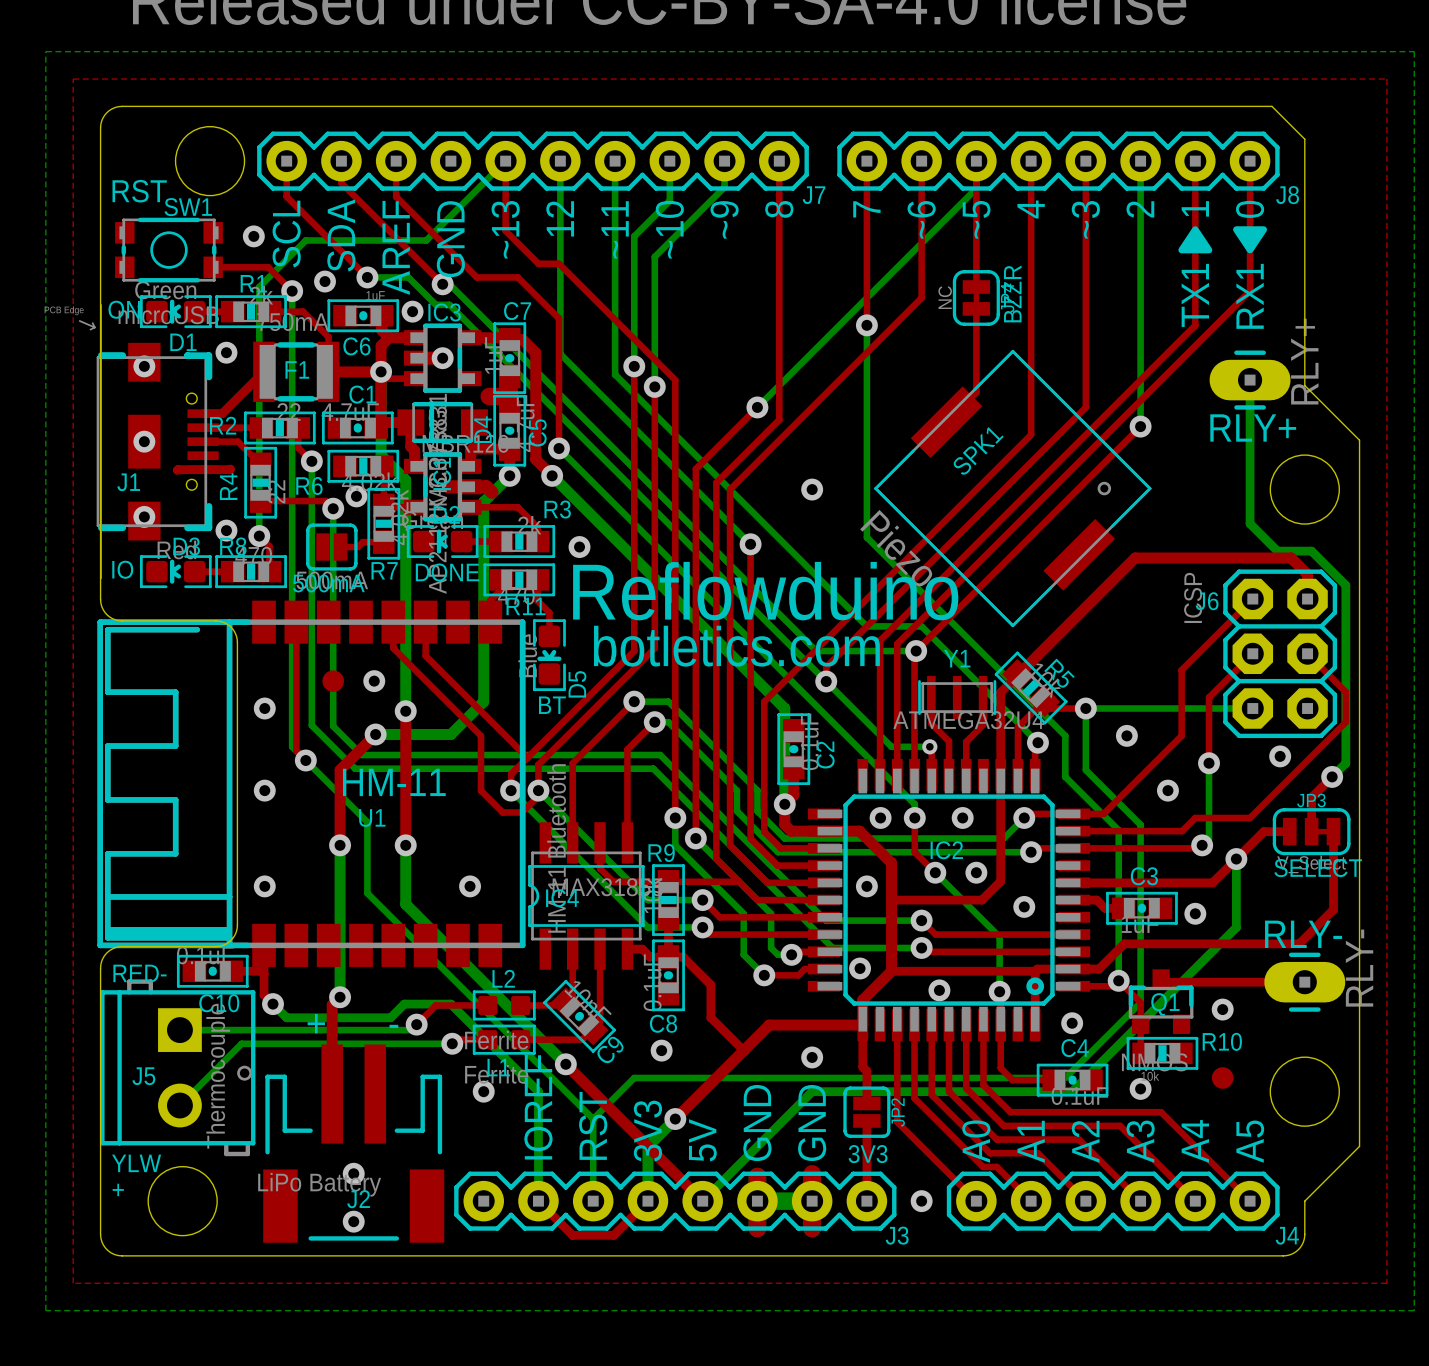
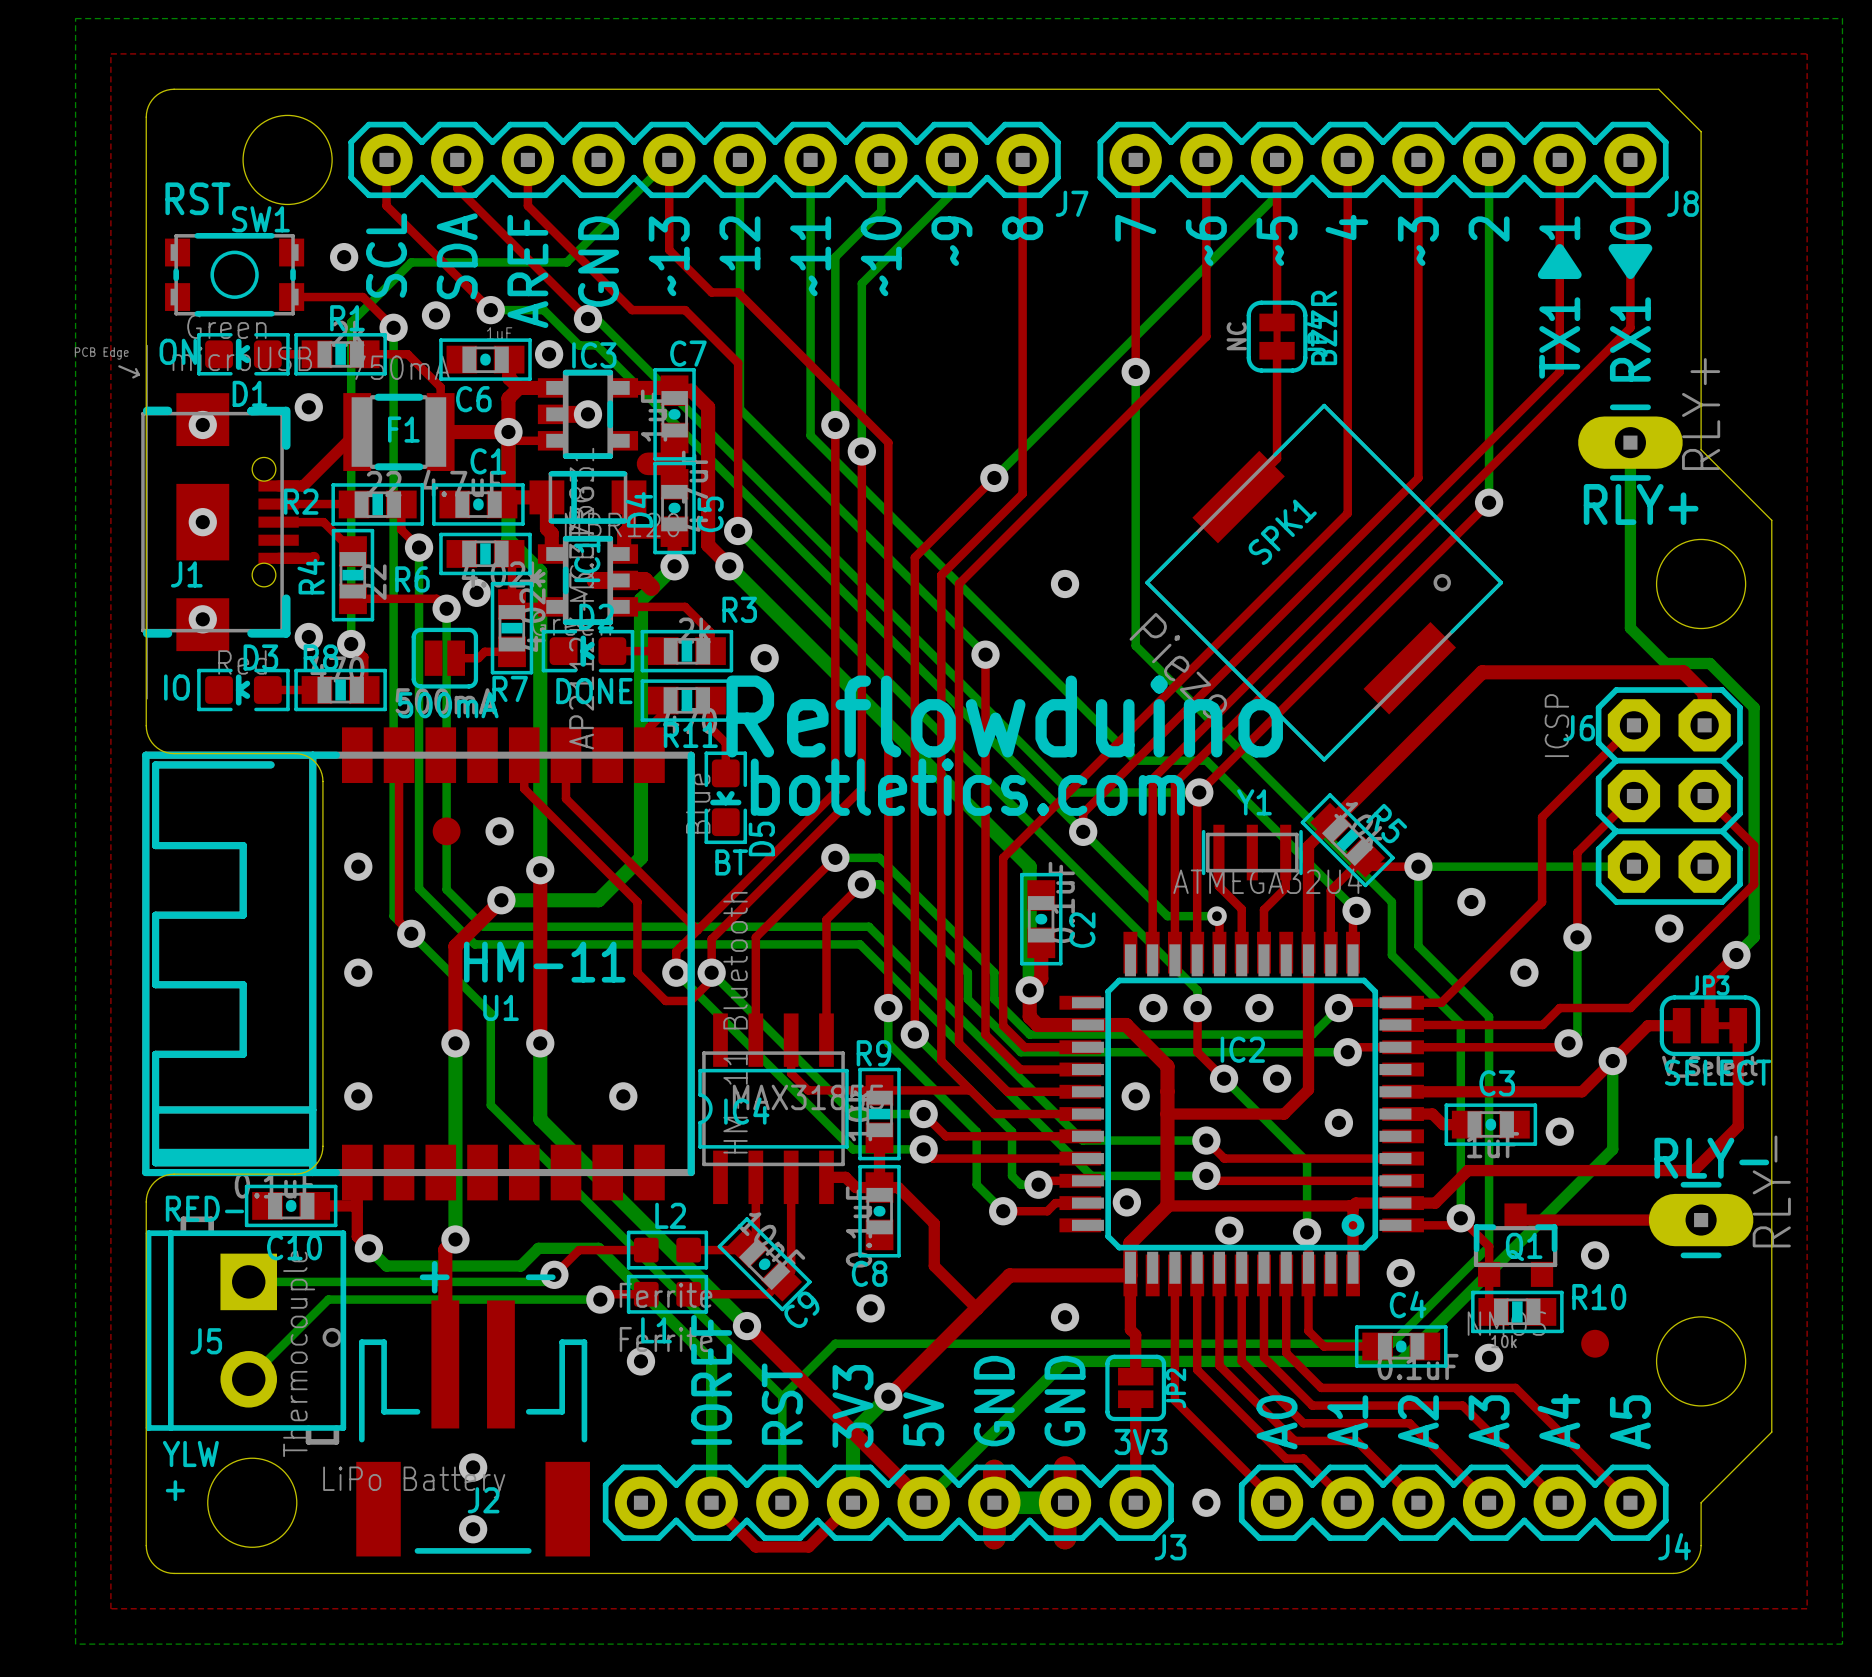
J1 footprint: [78, 304, 219, 579] -> [118, 345, 299, 699]
top track: (203, 469) (177, 470) -> none

